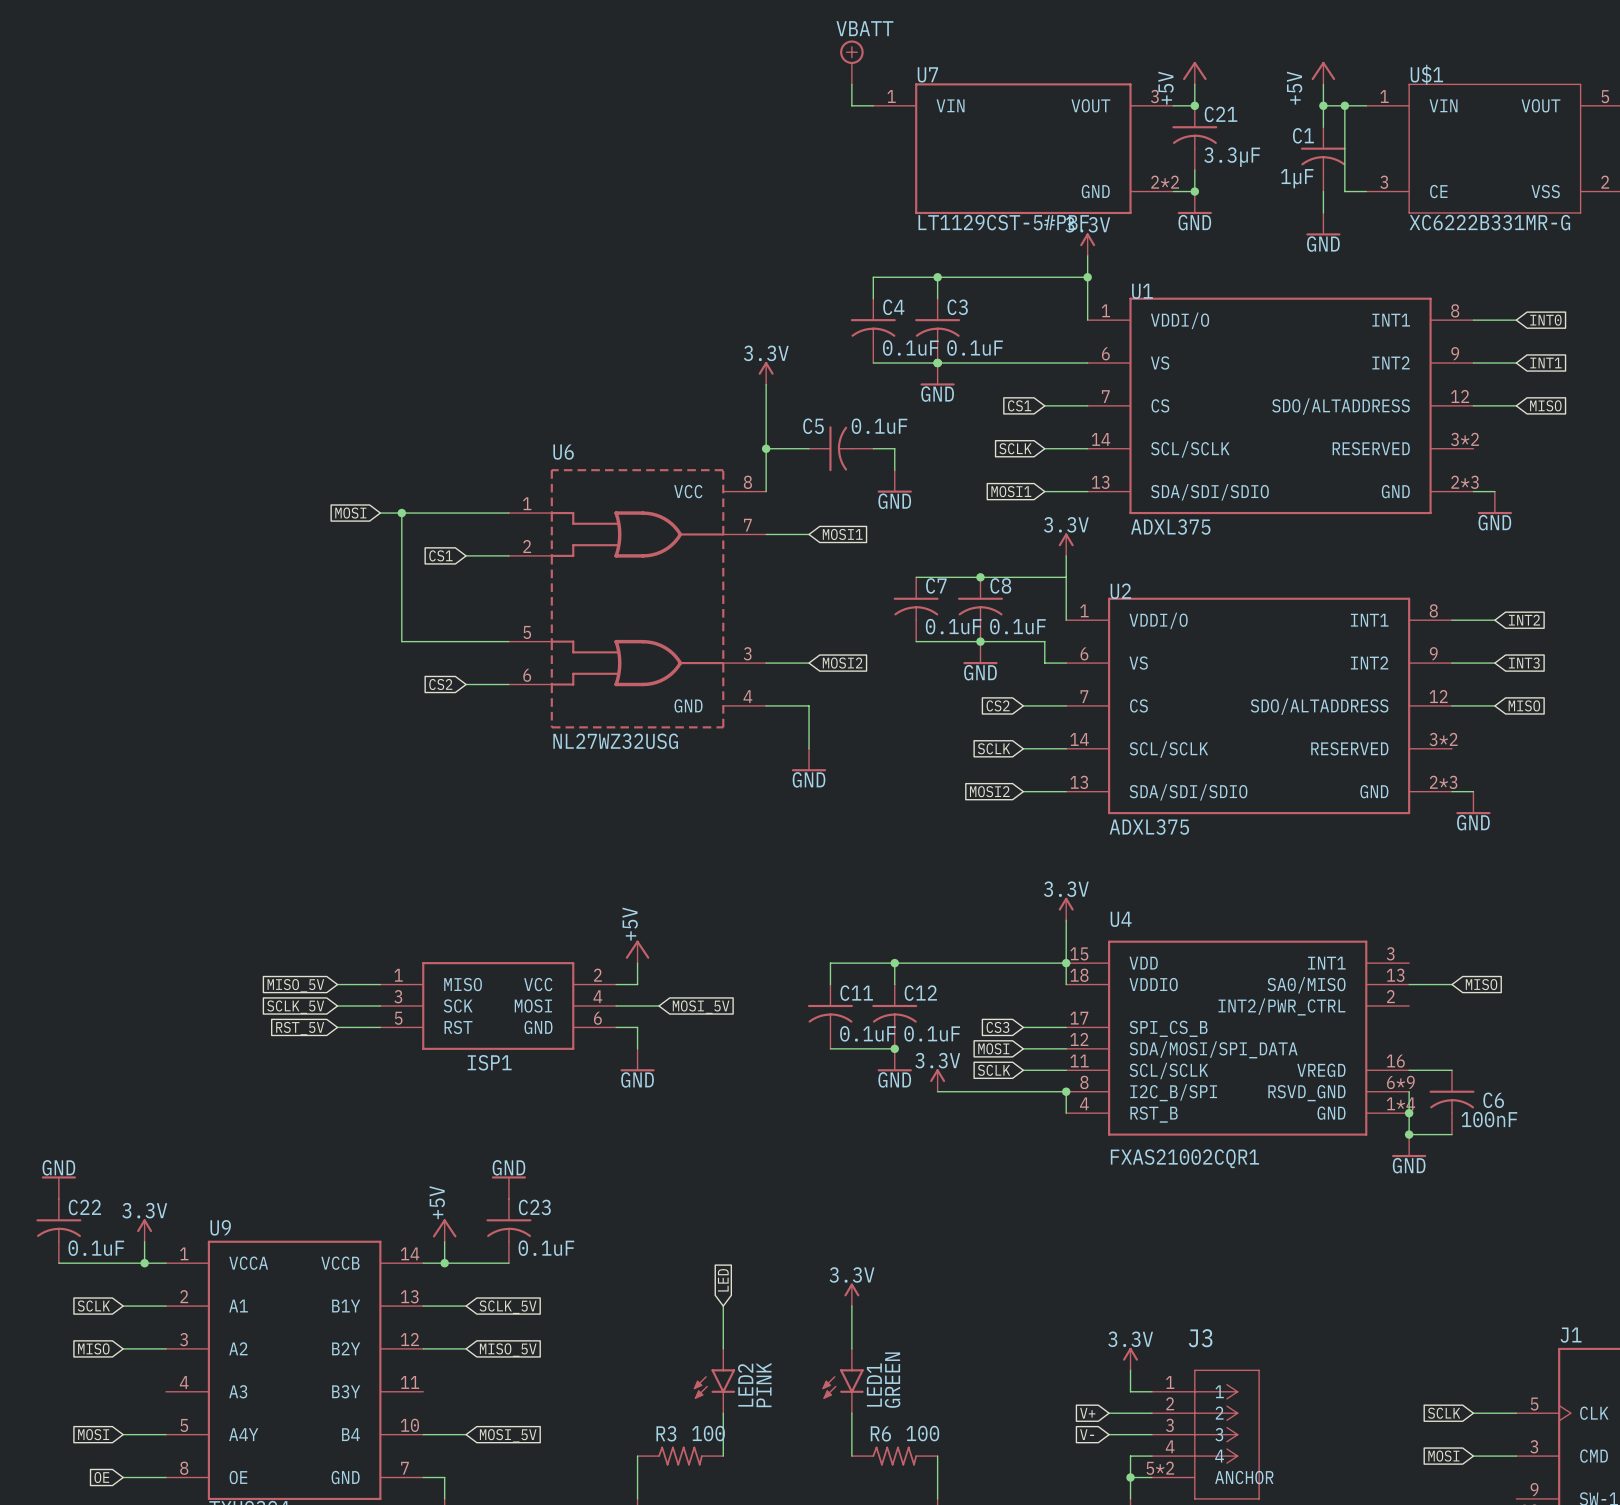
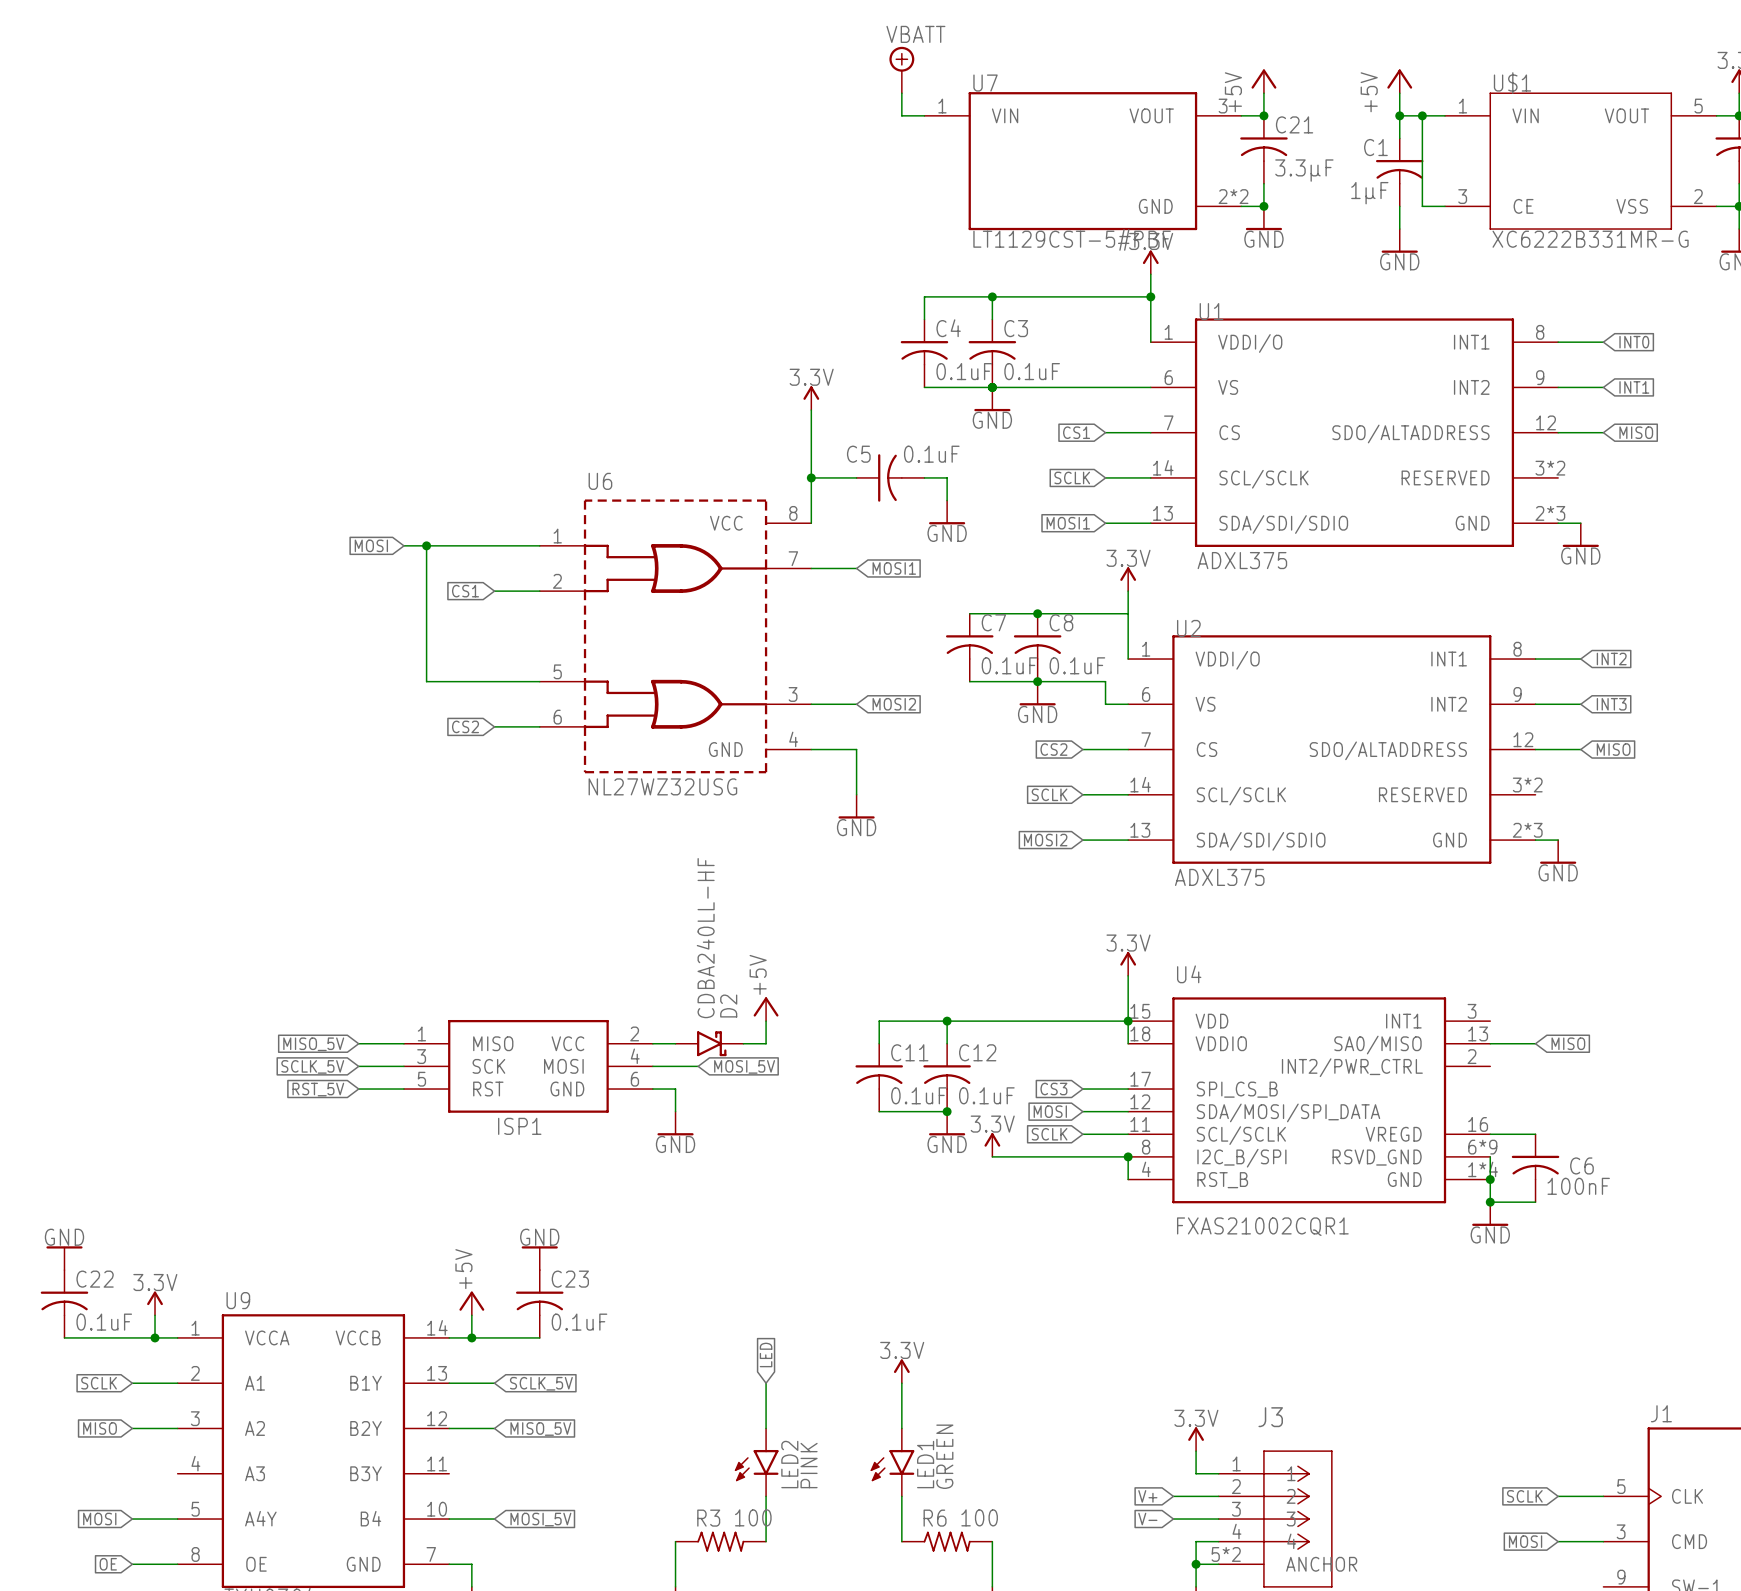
power symbol position: +5V (637, 951) -> +5V (766, 1009)
wire: (637, 963) (637, 984) -> none
wire: none -> (766, 1021) (766, 1043) (743, 1043)
D2: none -> CDBA240LL-HF (709, 1043)

